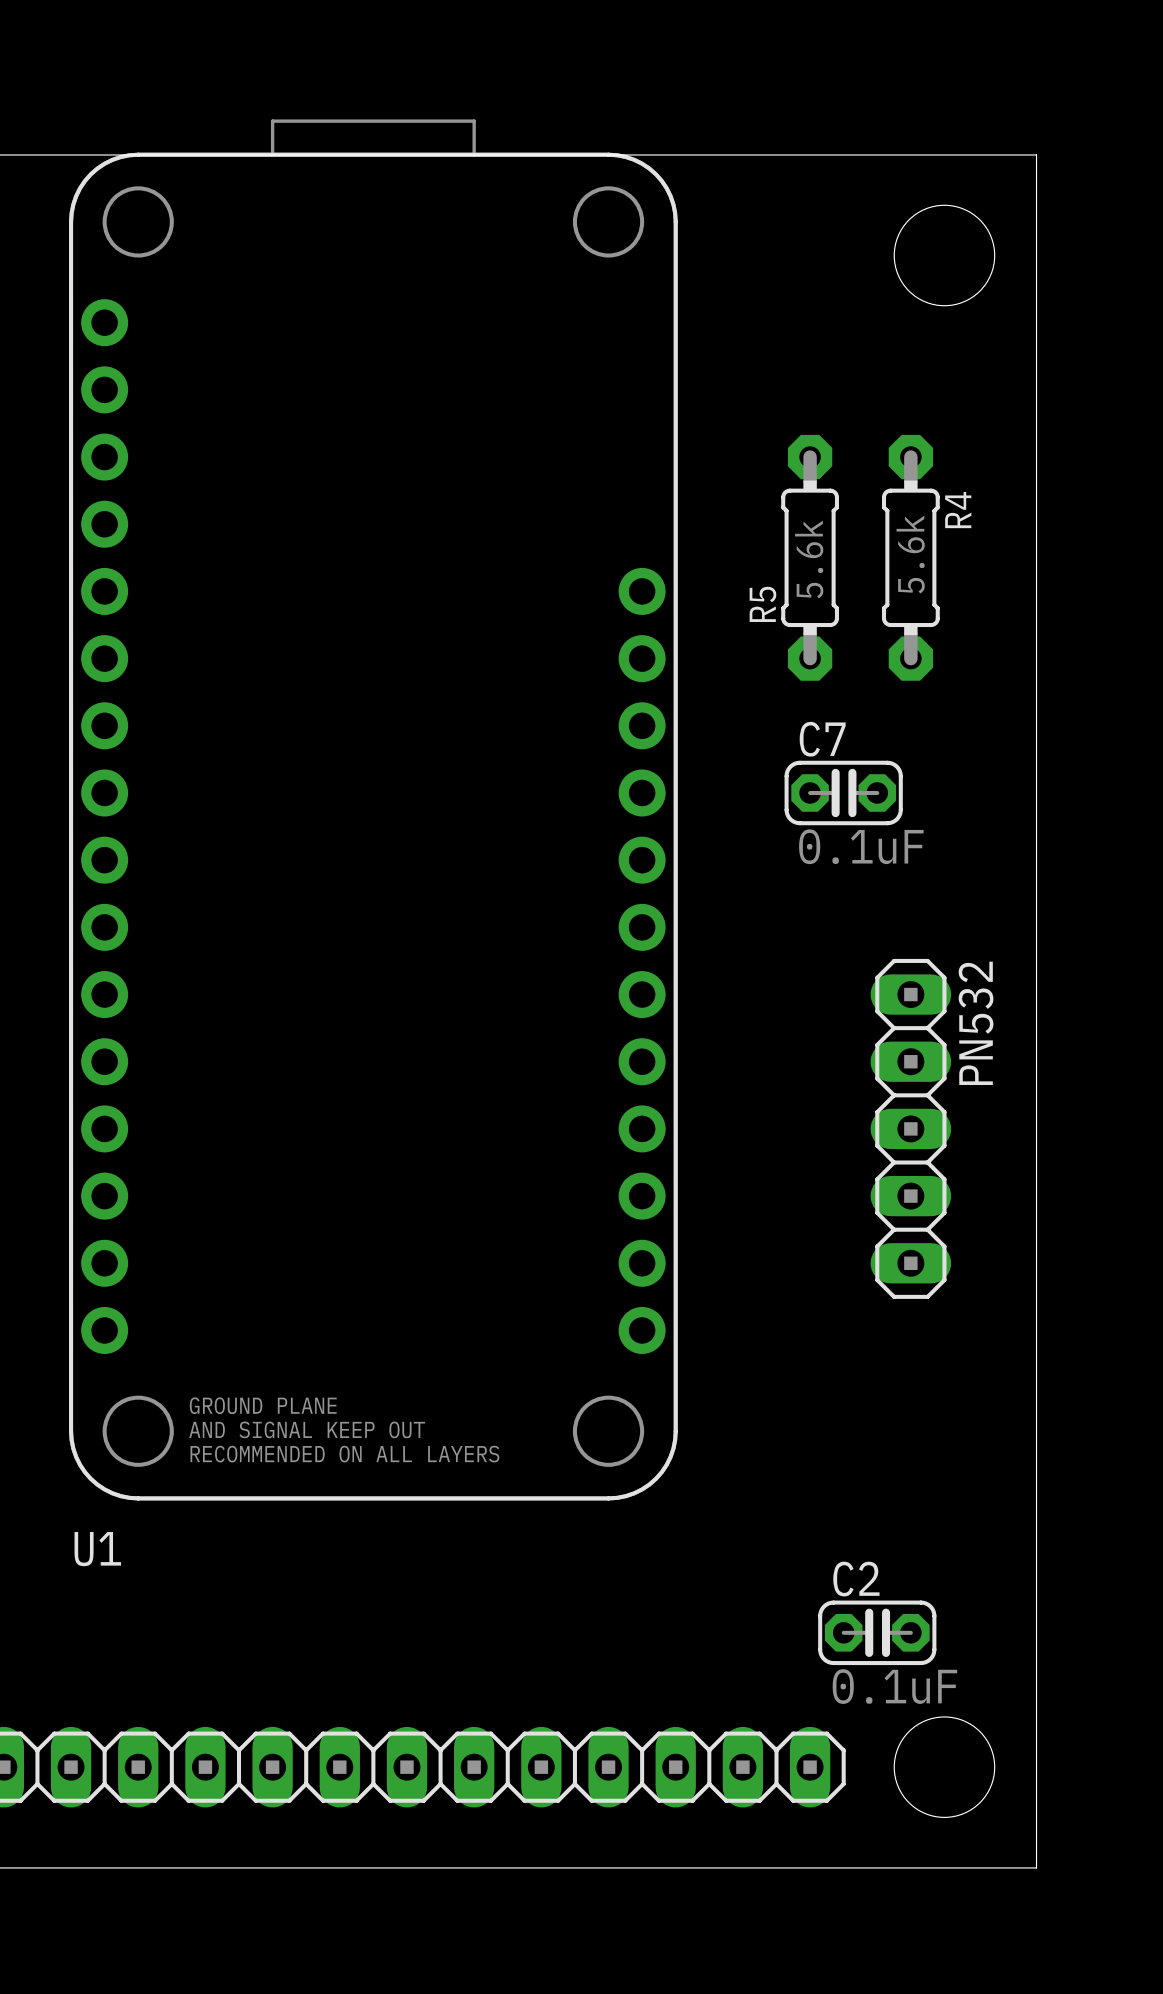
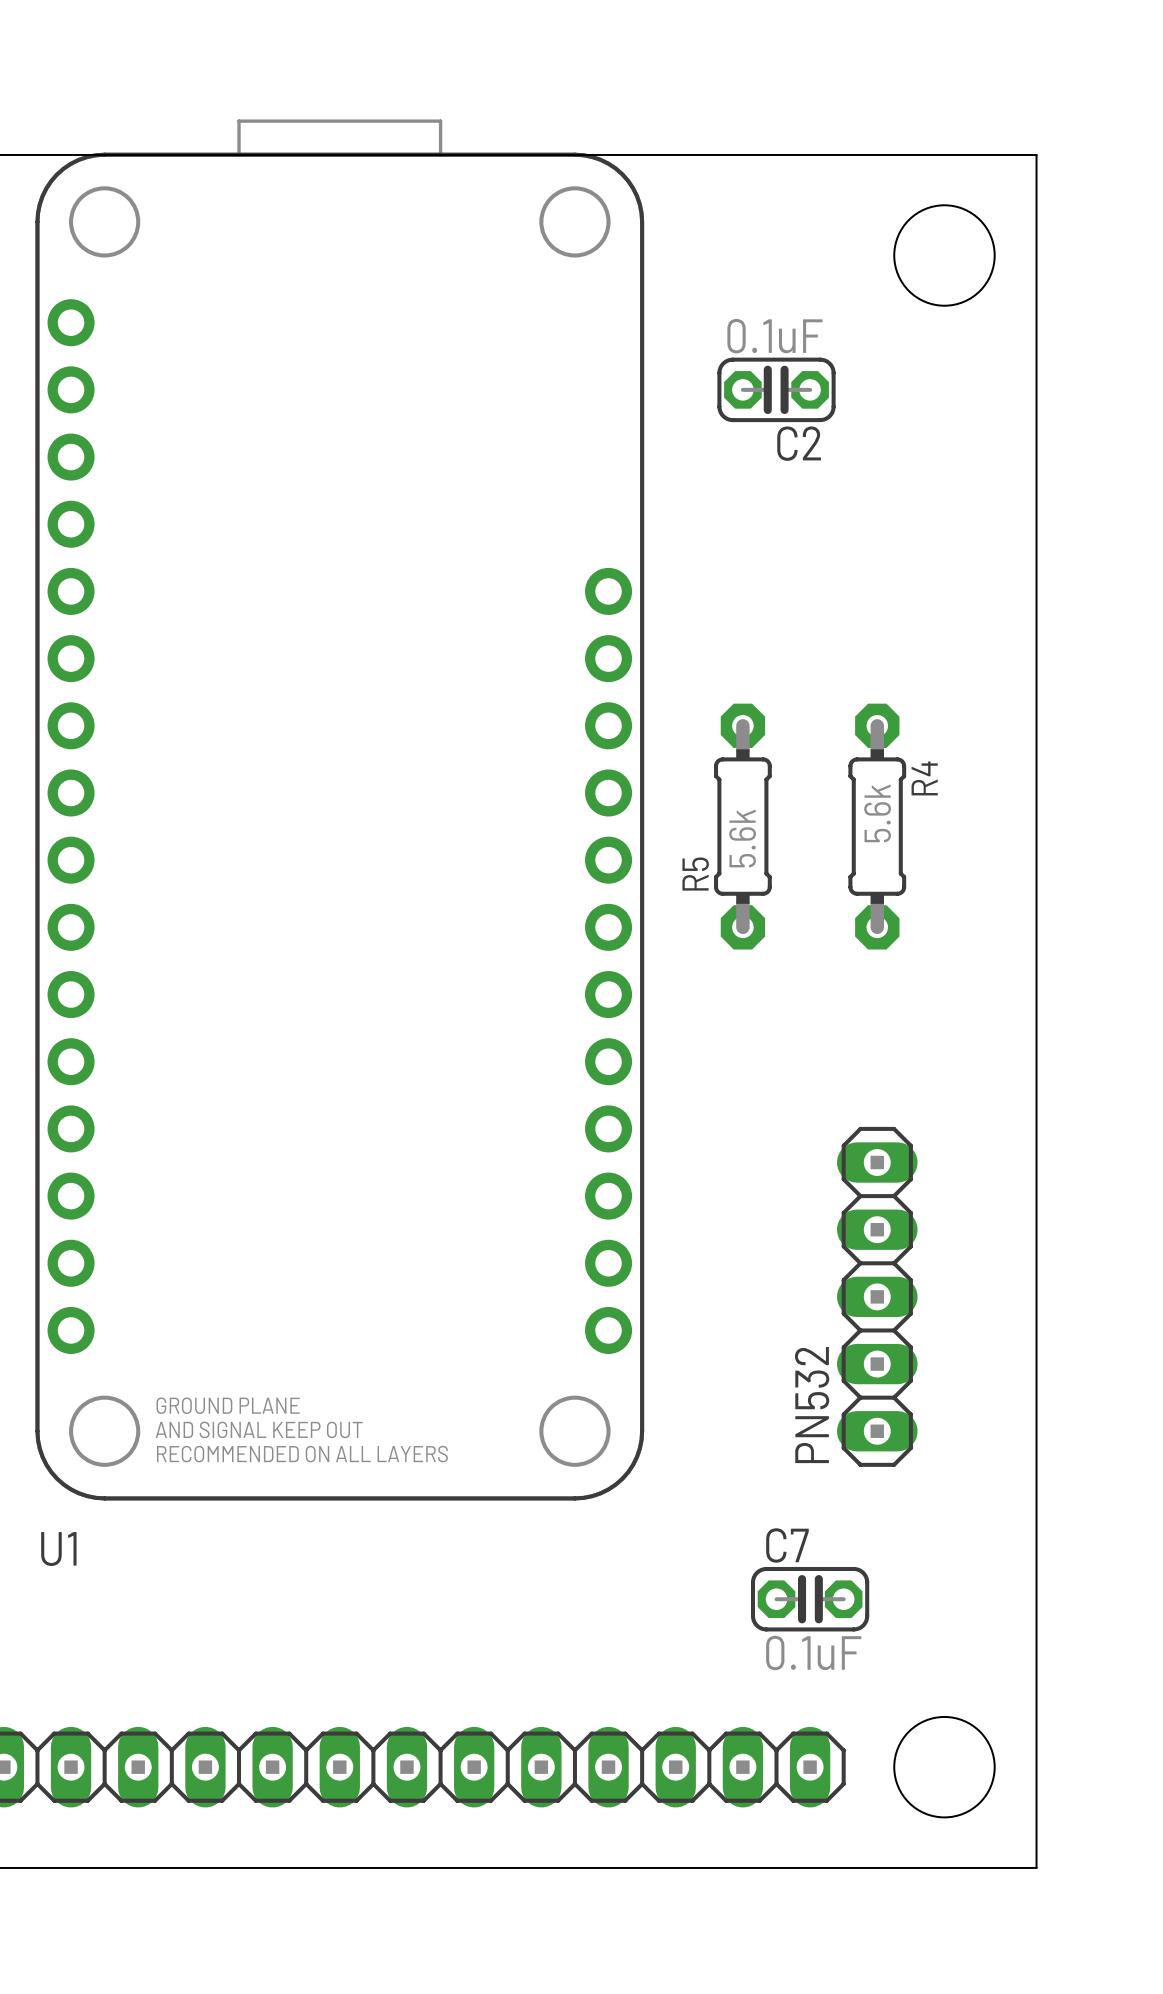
R5 position: (810, 557) -> (742, 826)
R4 position: (910, 557) -> (877, 826)
C7 position: (843, 792) -> (810, 1599)
U1 position: (373, 809) -> (339, 809)
PN532 name position: PN532 (976, 1023) -> PN532 (812, 1405)
PN532 position: (910, 1128) -> (877, 1296)
C2 rotation: 0° (877, 1632) -> 180° (776, 389)
C2 position: (877, 1632) -> (776, 389)

